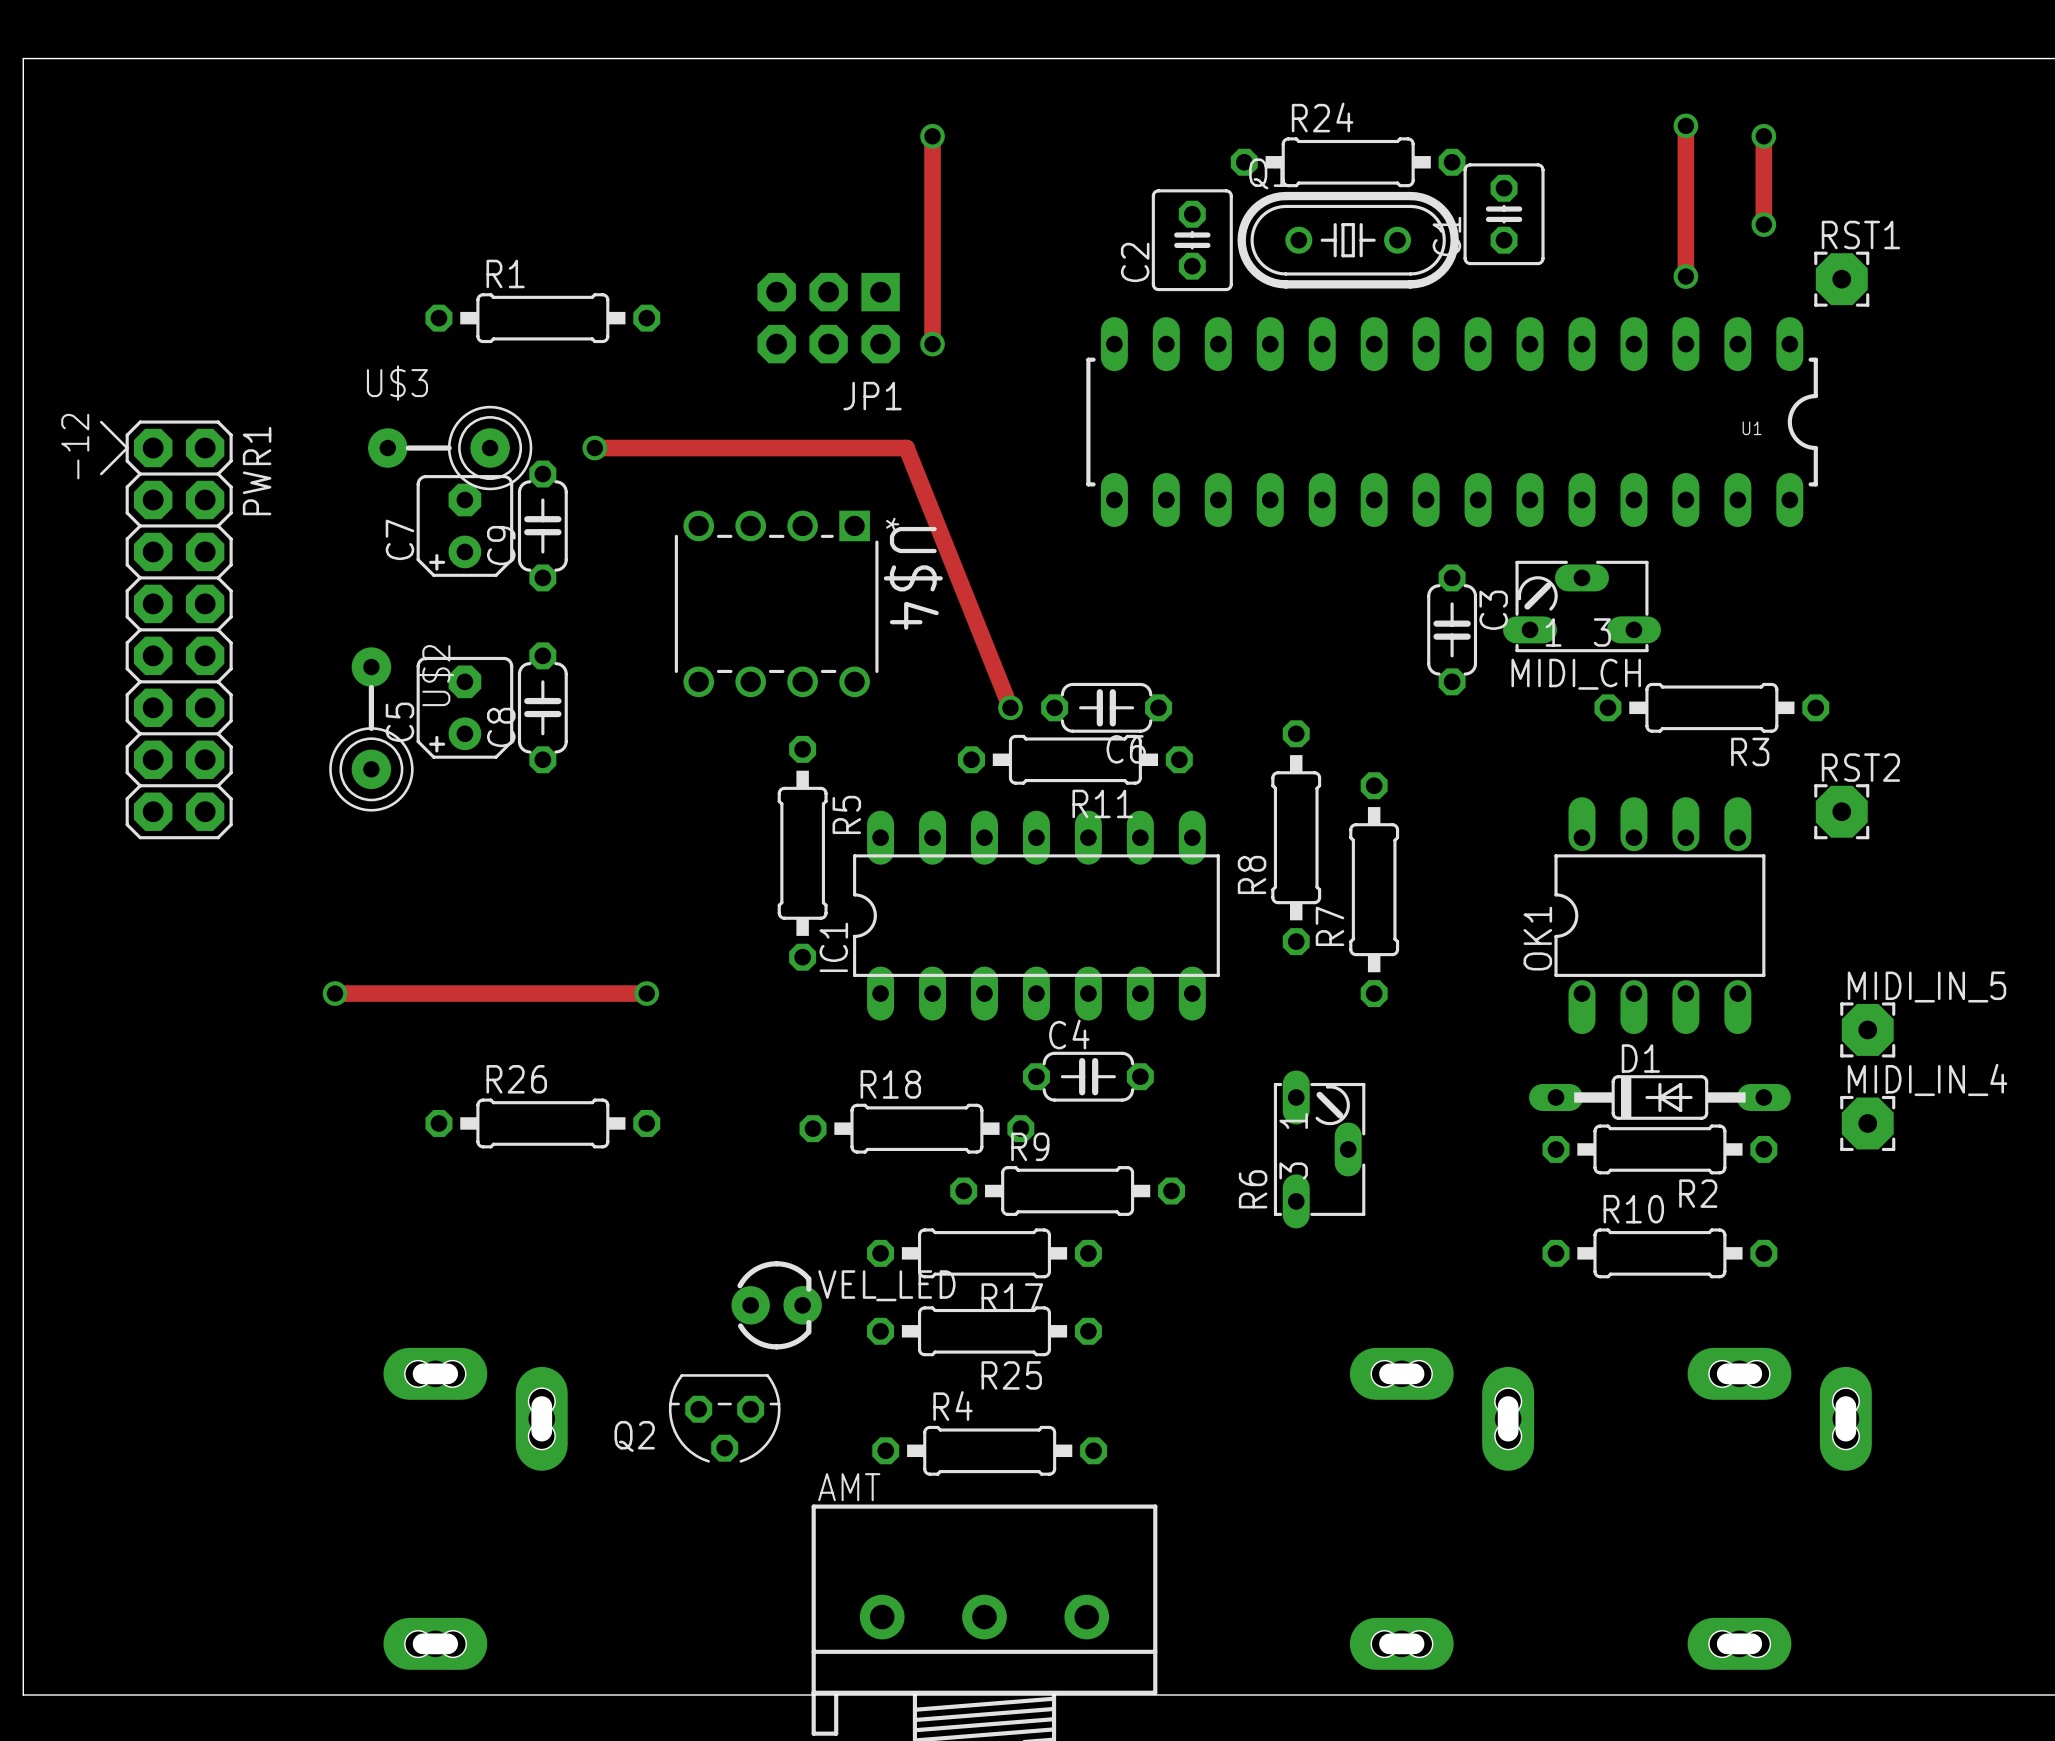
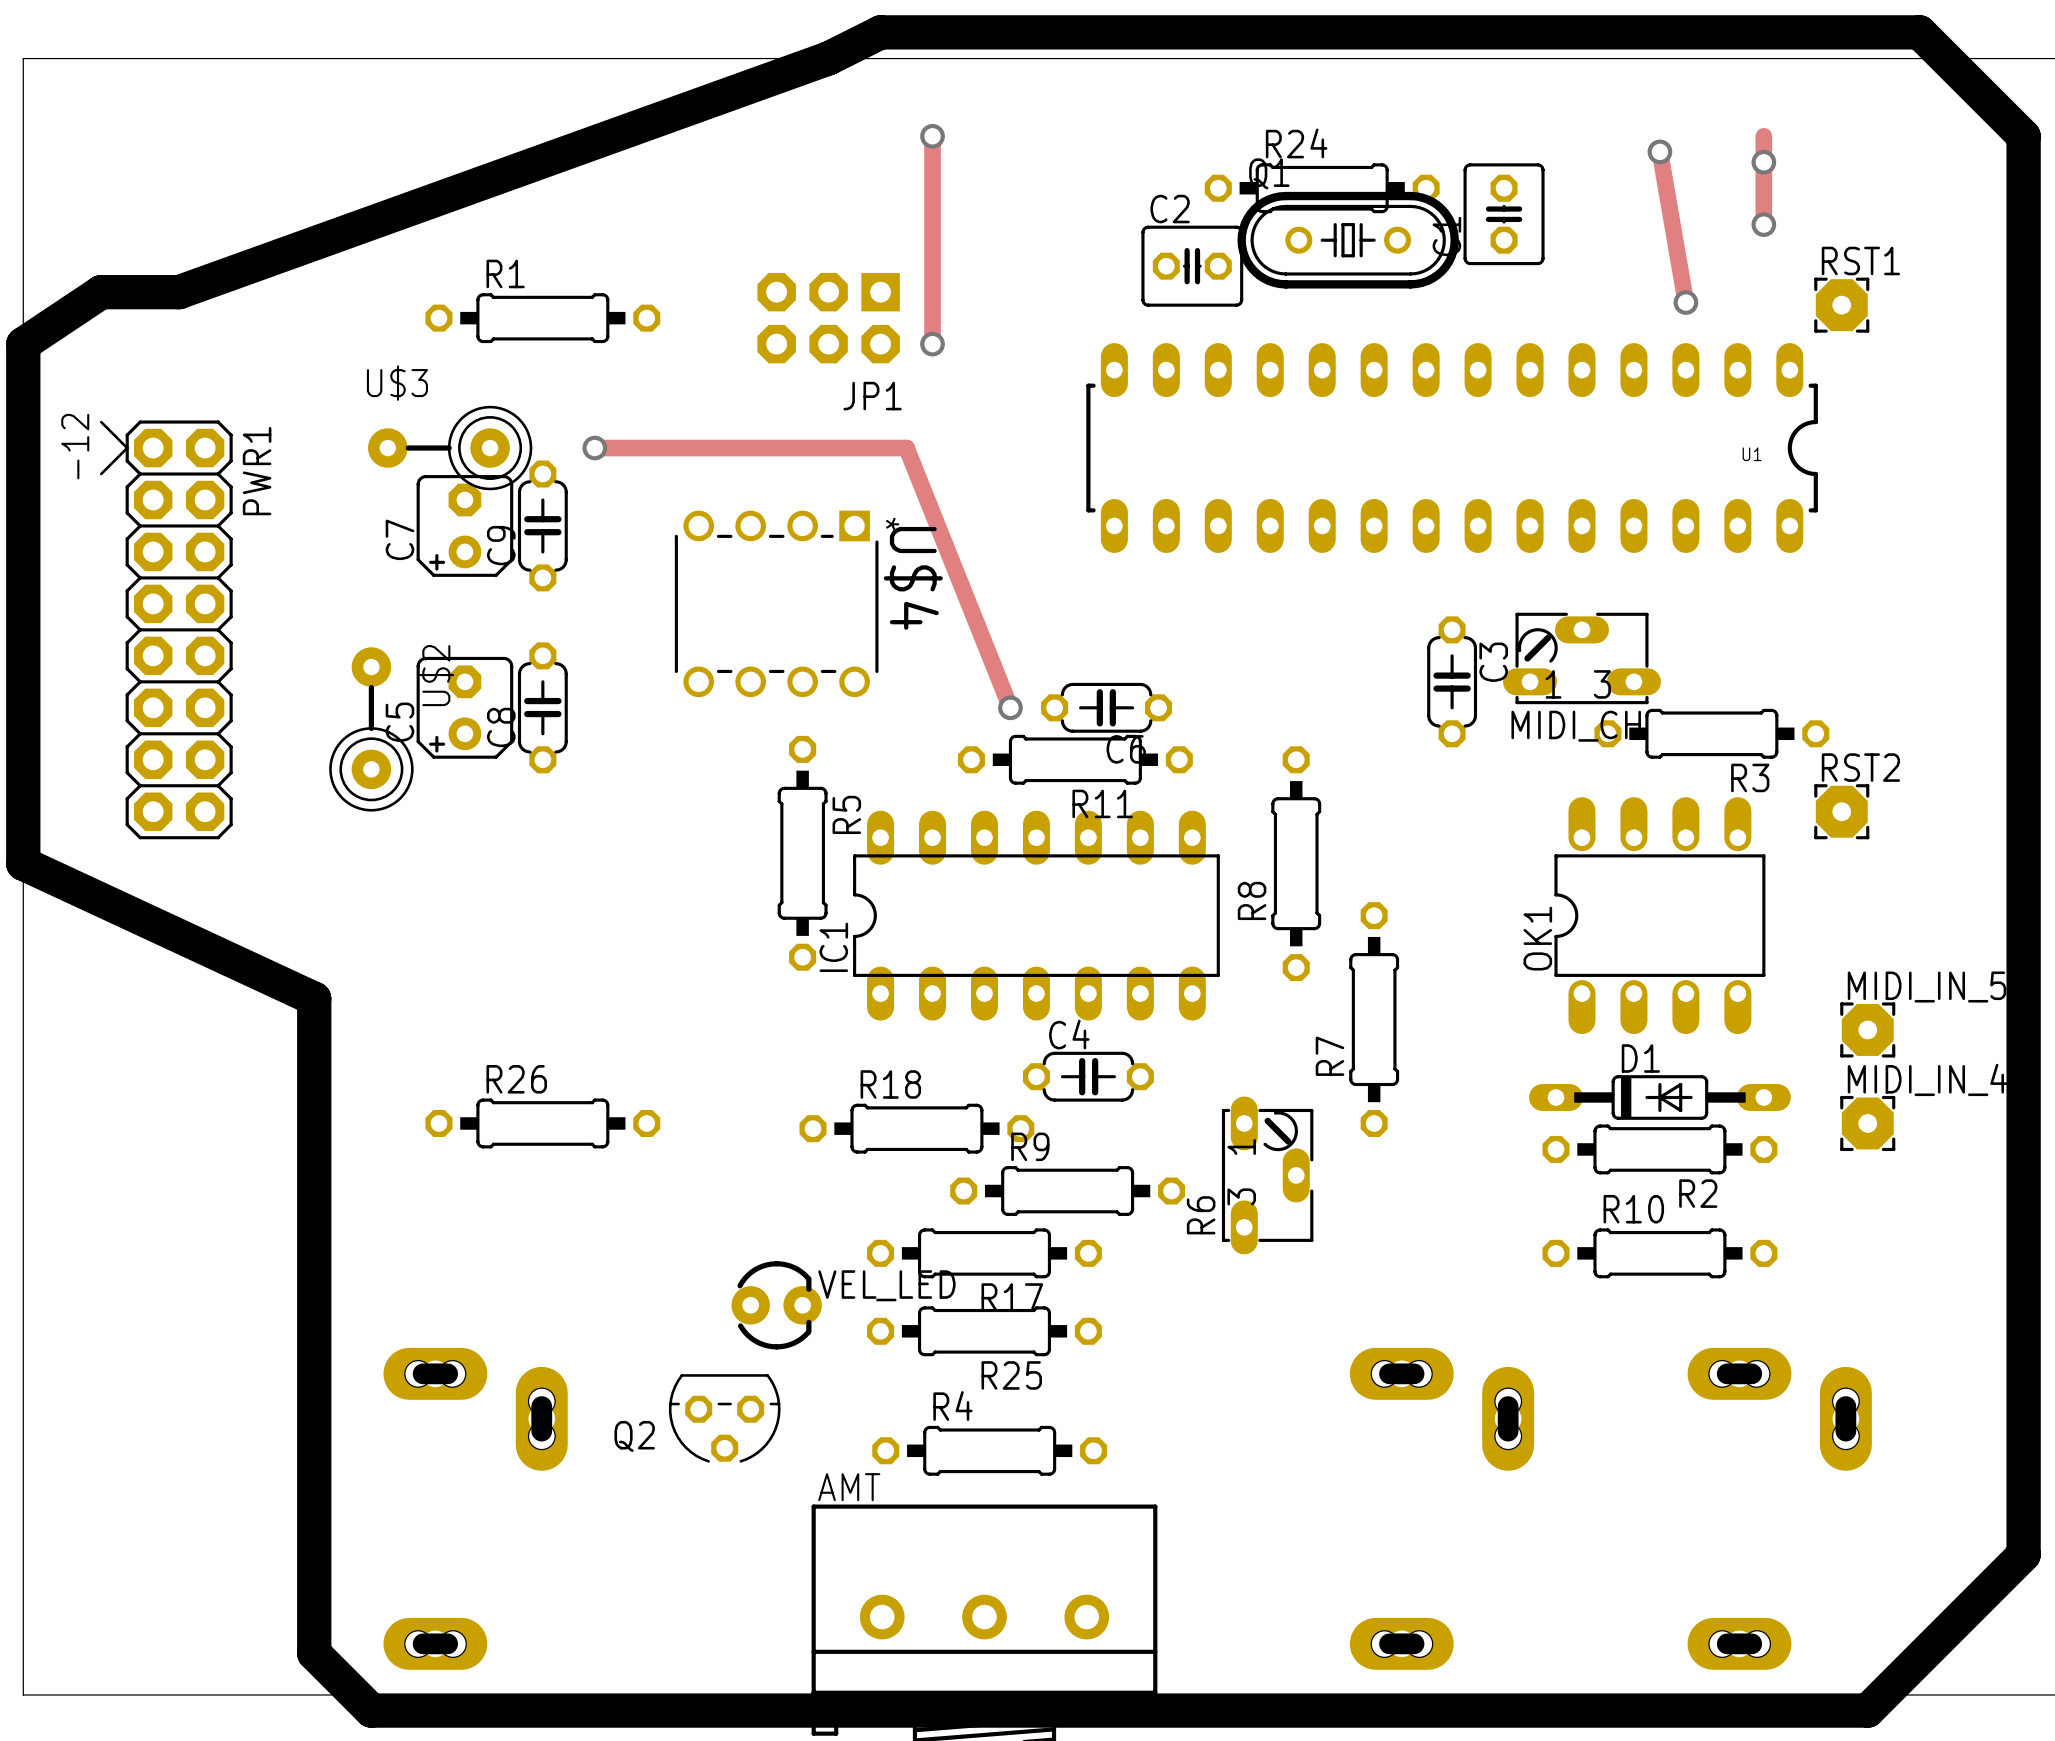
board edge: none -> (880, 32) (828, 58) (179, 292) (101, 292) (23, 344) (23, 863) (314, 998) (314, 1653) (371, 1710) (1867, 1710) (2023, 1554) (2023, 136) (1919, 32) (880, 32)
track: (1685, 125) (1685, 276) -> none
via position: (1685, 125) -> (1659, 151)
via position: (1763, 136) -> (1763, 162)
track: none -> (1659, 151) (1685, 302)
R24 position: (1348, 162) -> (1322, 188)
C2 rotation: 0° (1192, 240) -> 90° clockwise (1192, 266)
via position: (1685, 276) -> (1685, 302)
RST1 position: (1841, 279) -> (1841, 305)
U1 position: (1452, 422) -> (1452, 448)
MIDI_CH position: (1581, 606) -> (1581, 658)
C3 position: (1452, 629) -> (1452, 681)
R3 position: (1711, 707) -> (1711, 733)
R8 position: (1296, 837) -> (1296, 863)
R7 position: (1374, 889) -> (1374, 1019)
track: (335, 993) (646, 993) -> none
via: (335, 993) -> none
via: (646, 993) -> none
R6 position: (1319, 1149) -> (1267, 1175)

